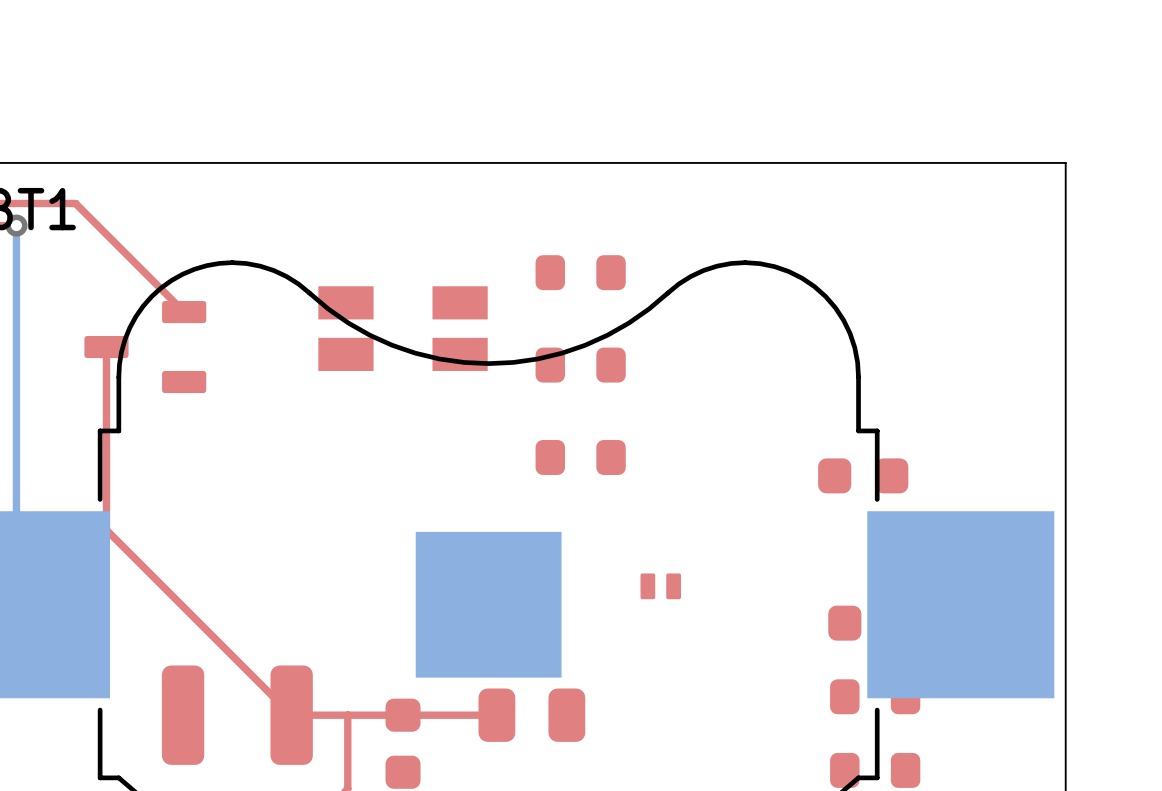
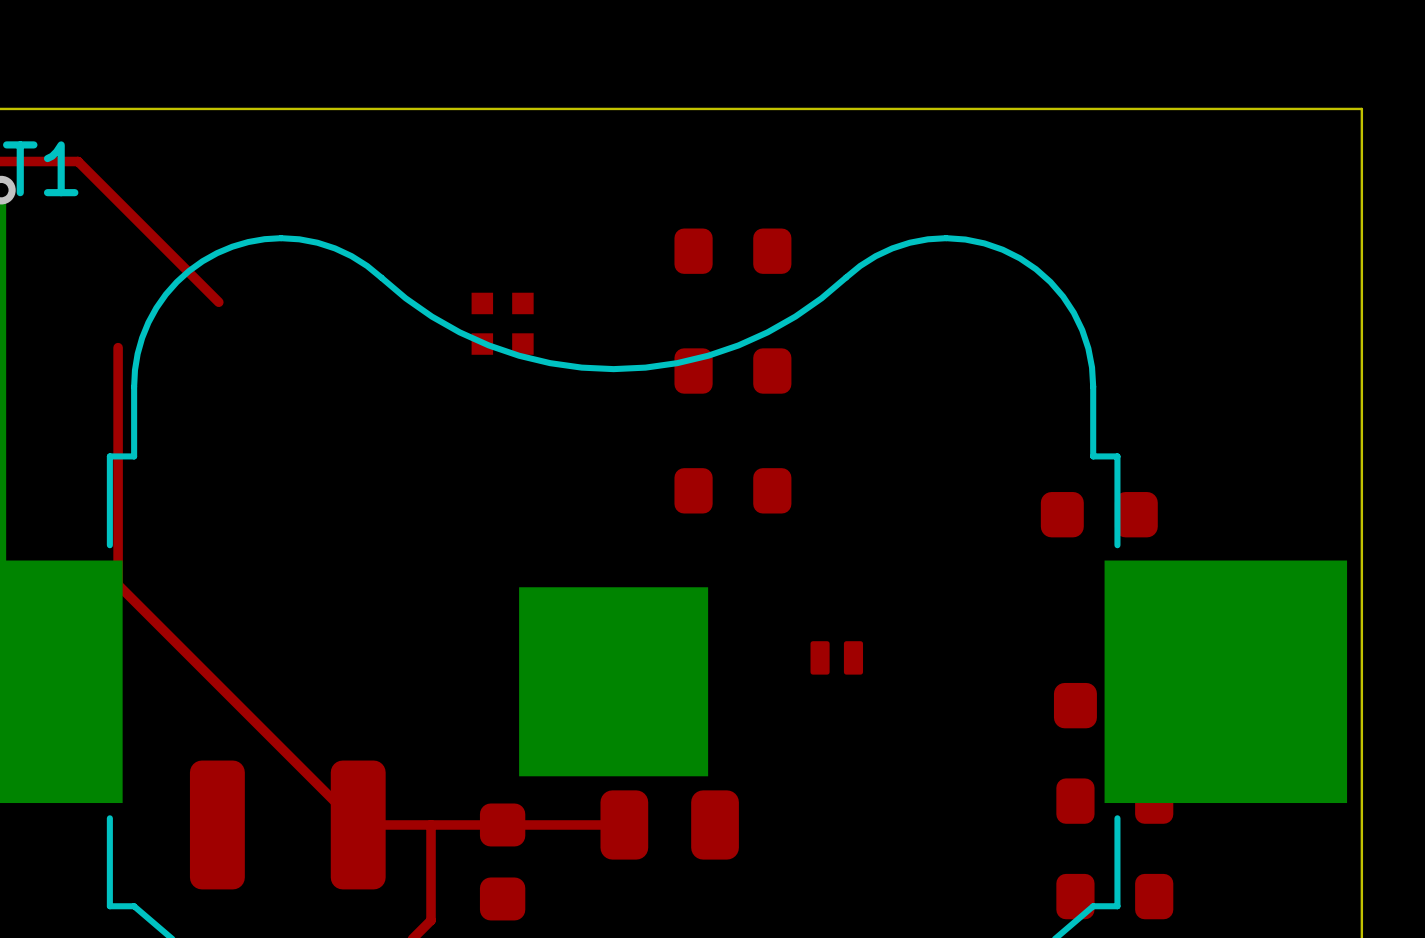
part footprint: [318, 286, 488, 371] -> [471, 292, 534, 355]
part: (145, 347) -> none

